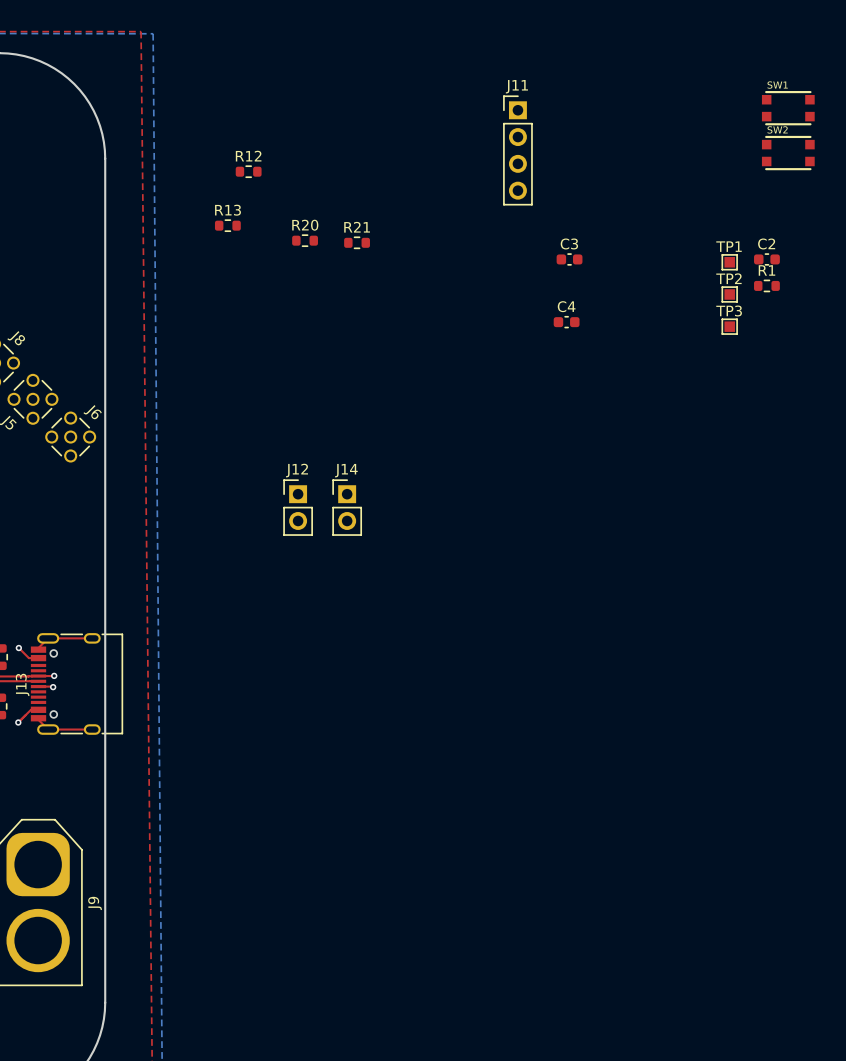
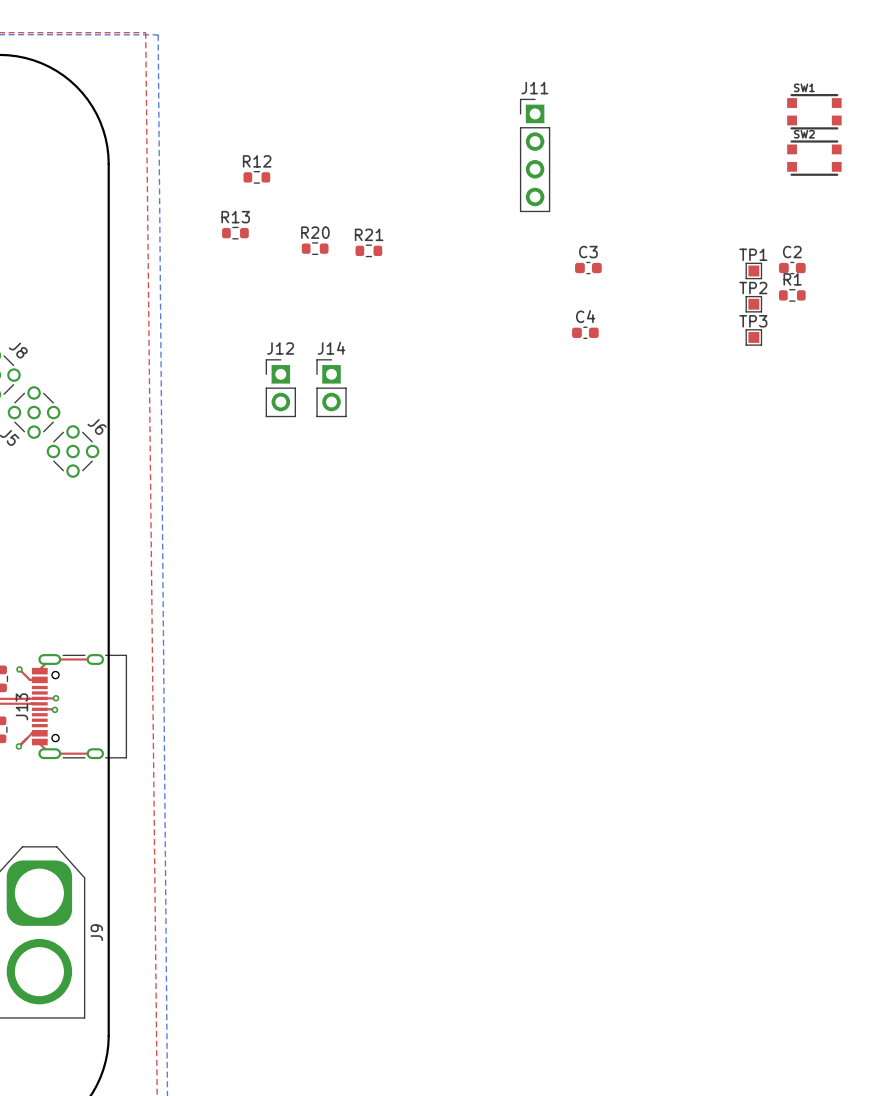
J12 position: (298, 507) -> (280, 388)
J14 position: (347, 507) -> (331, 388)

